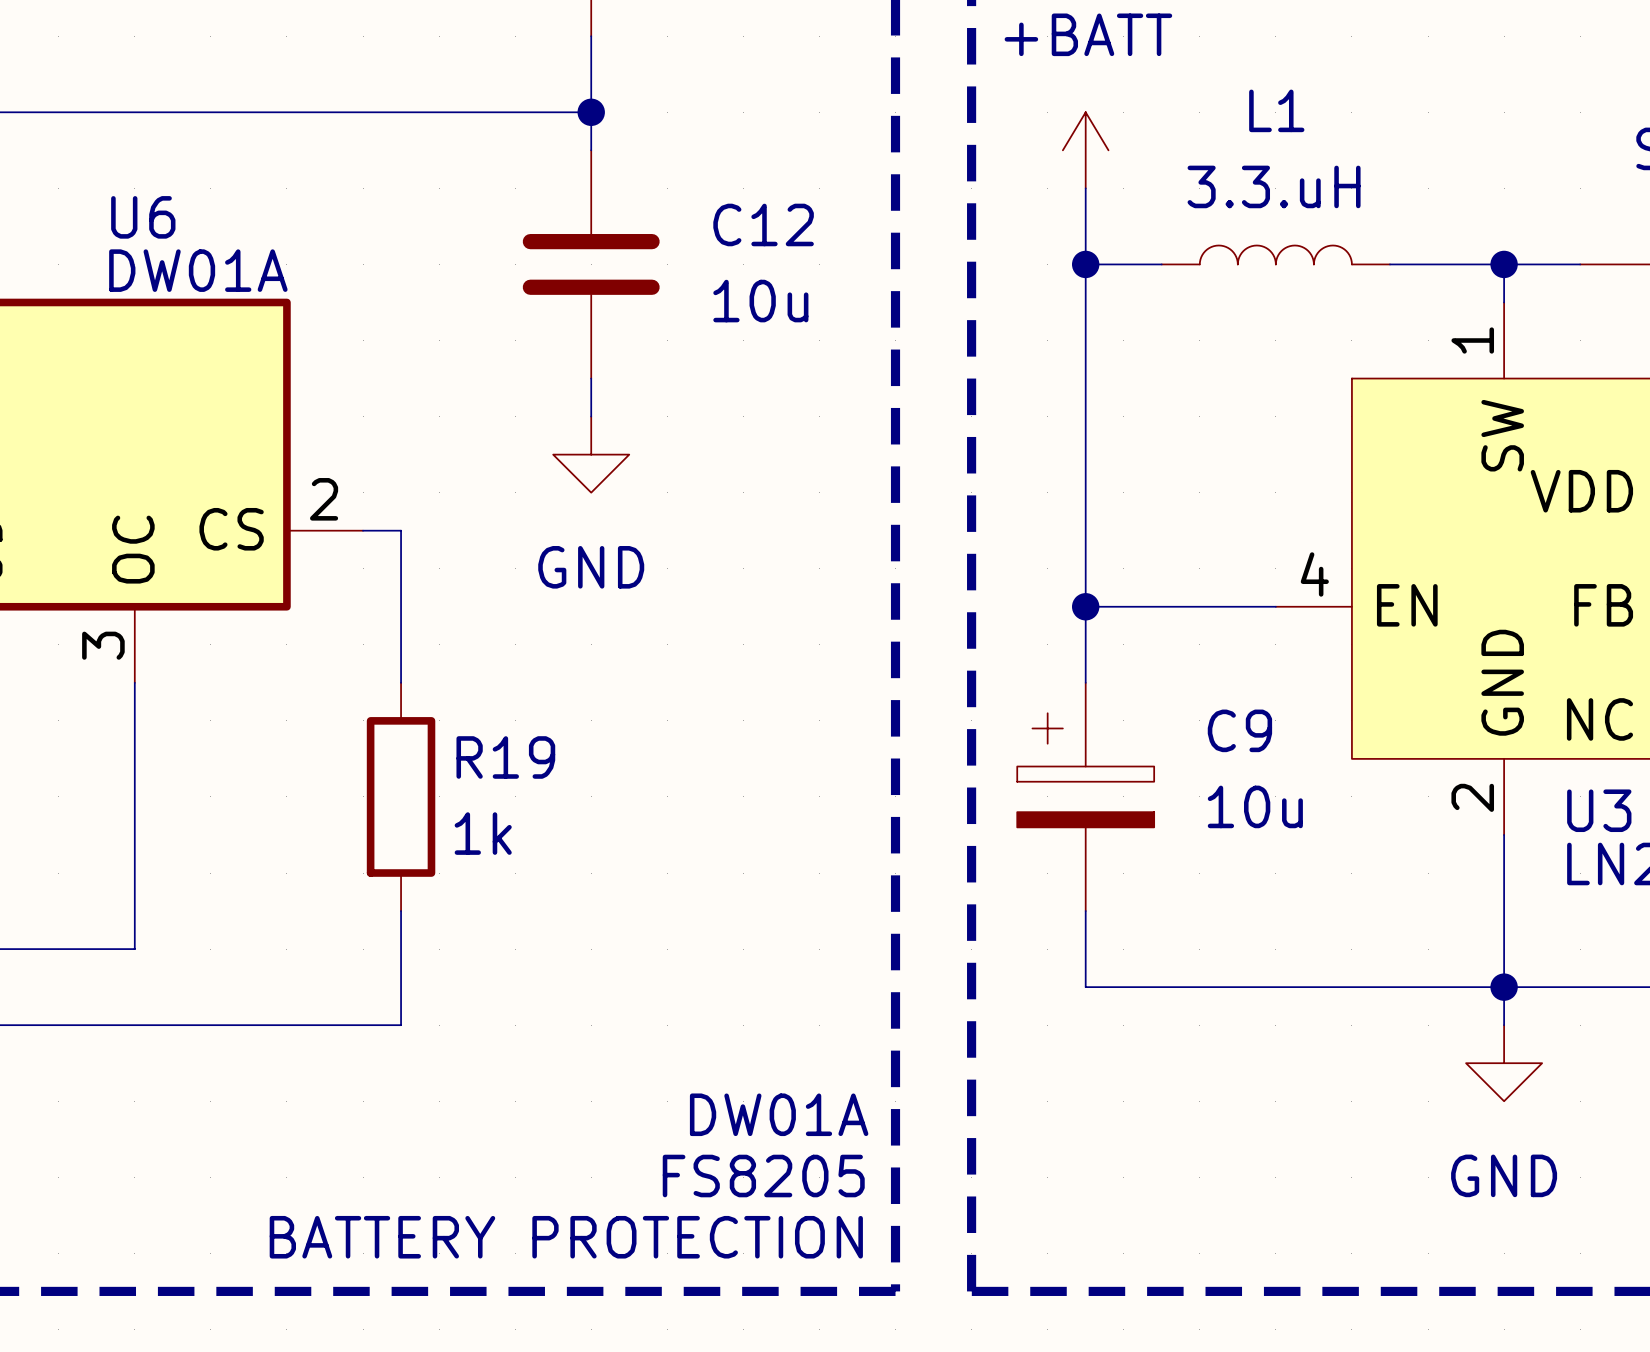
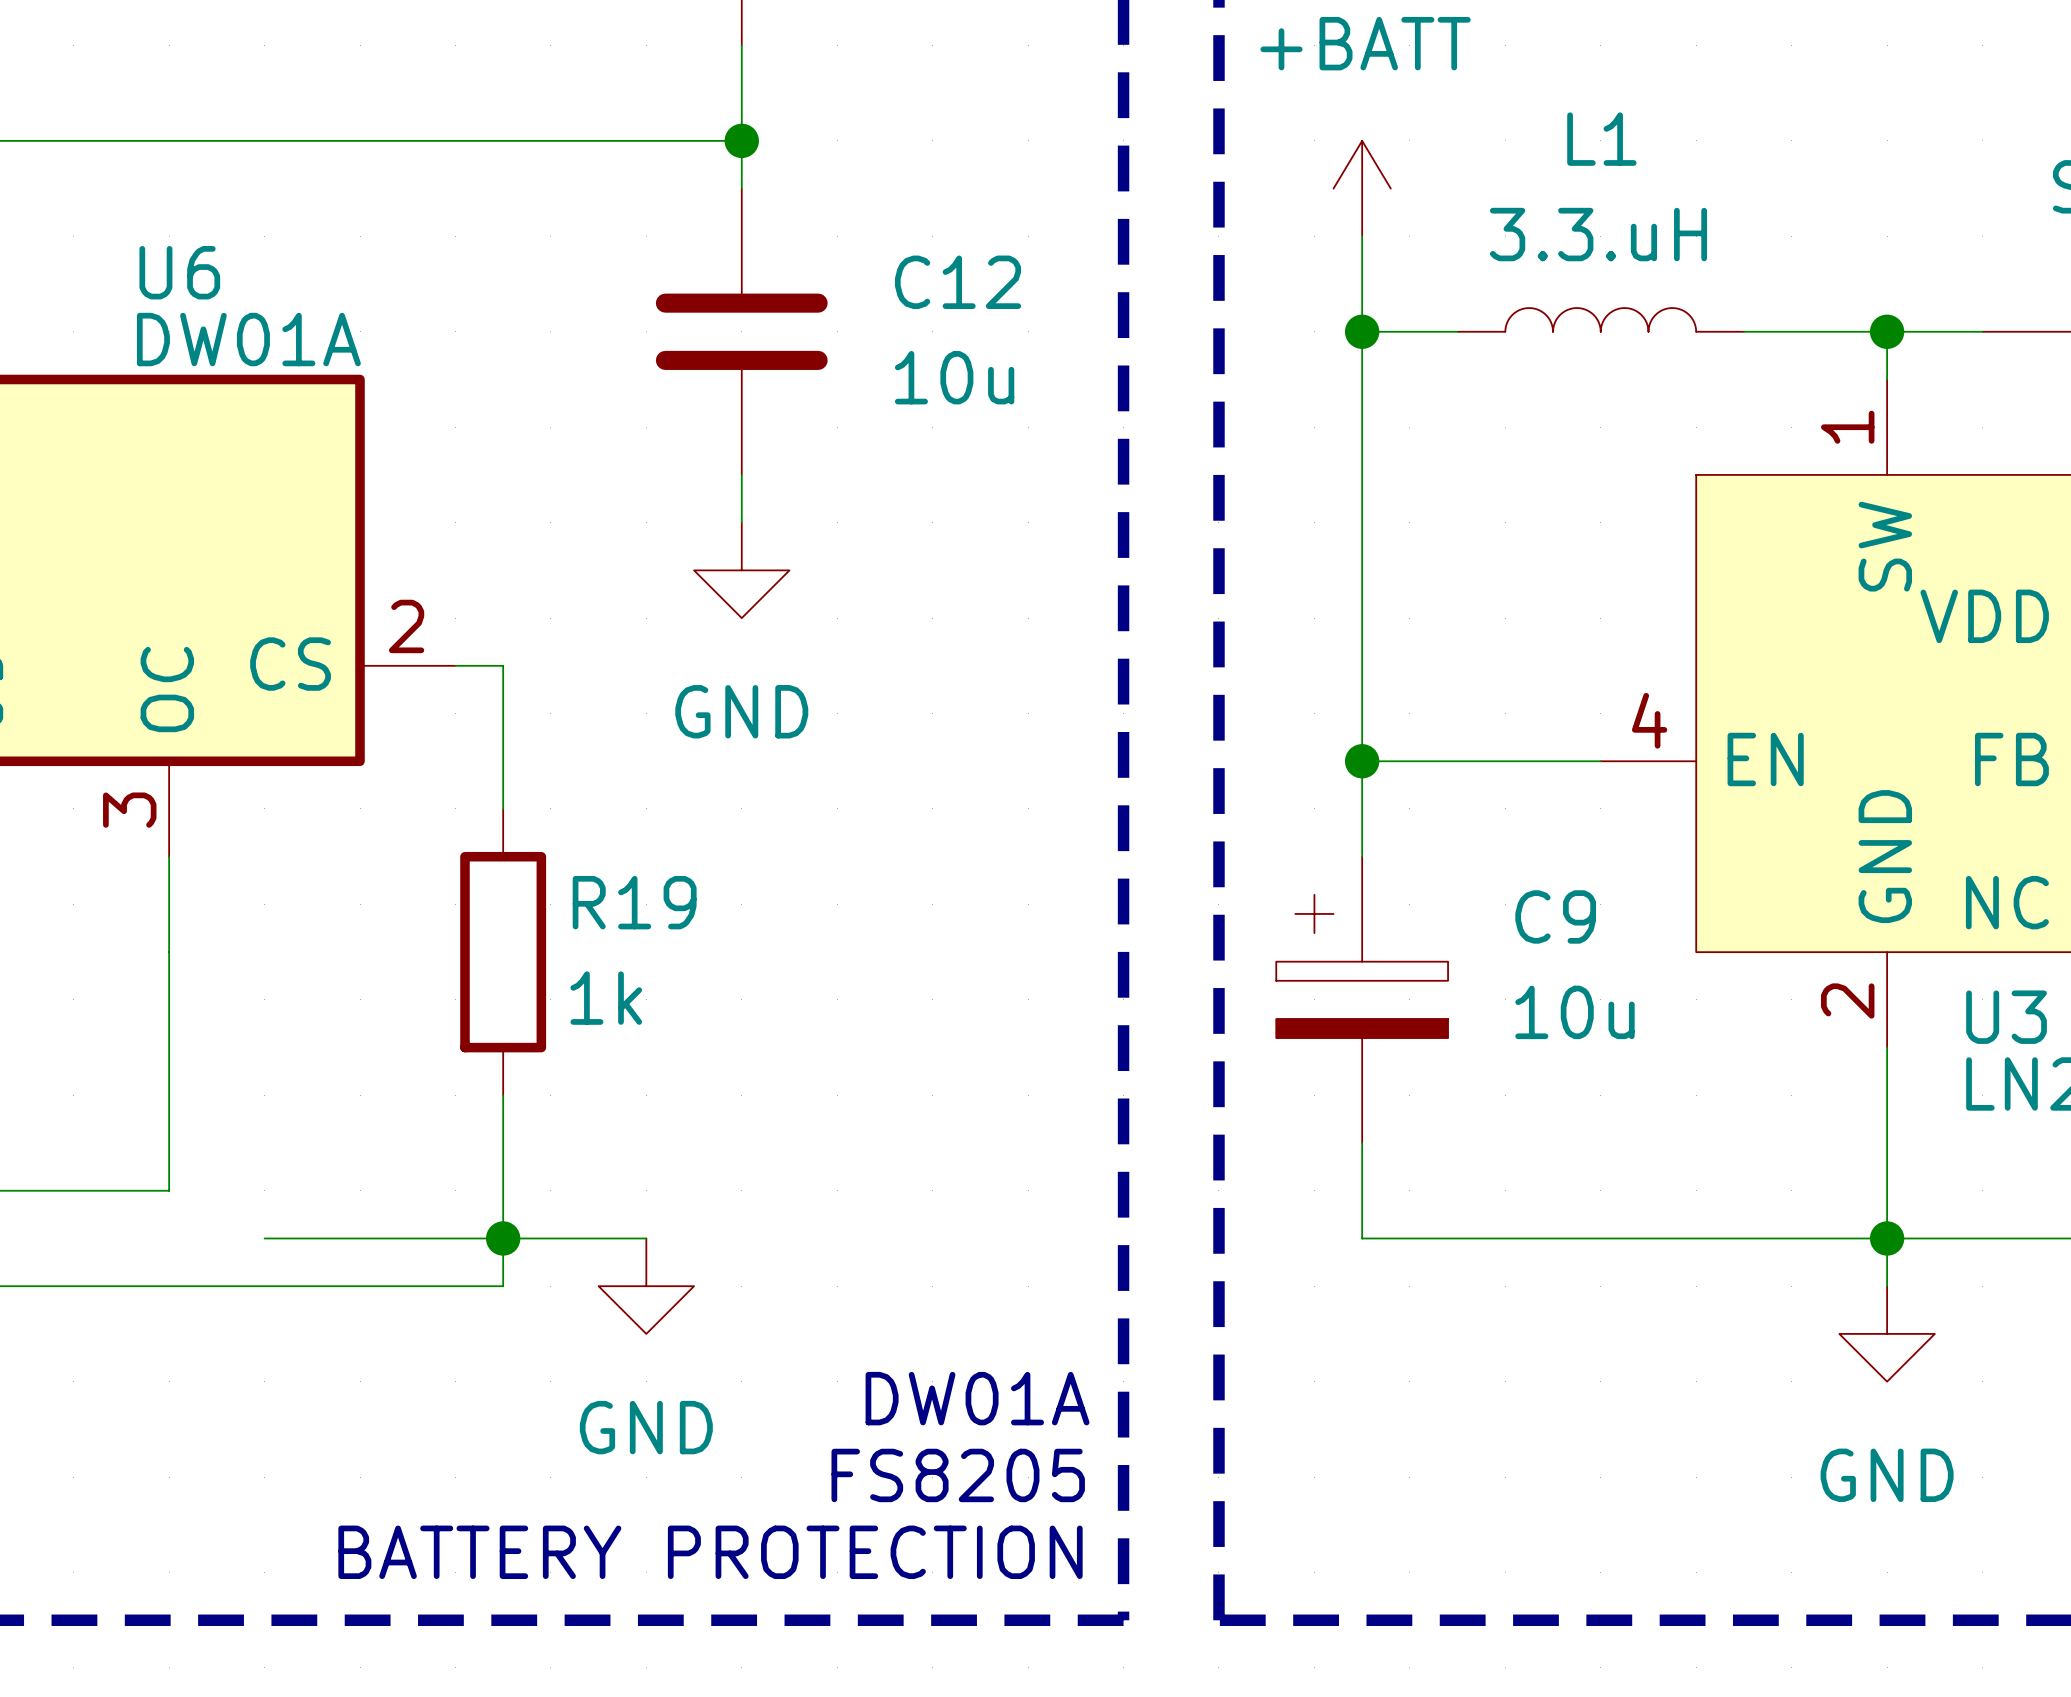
R19 position: (401, 796) -> (503, 952)
wire: none -> (264, 1238) (646, 1238)
junction: none -> (503, 1238)
power symbol: none -> GND (646, 1286)

